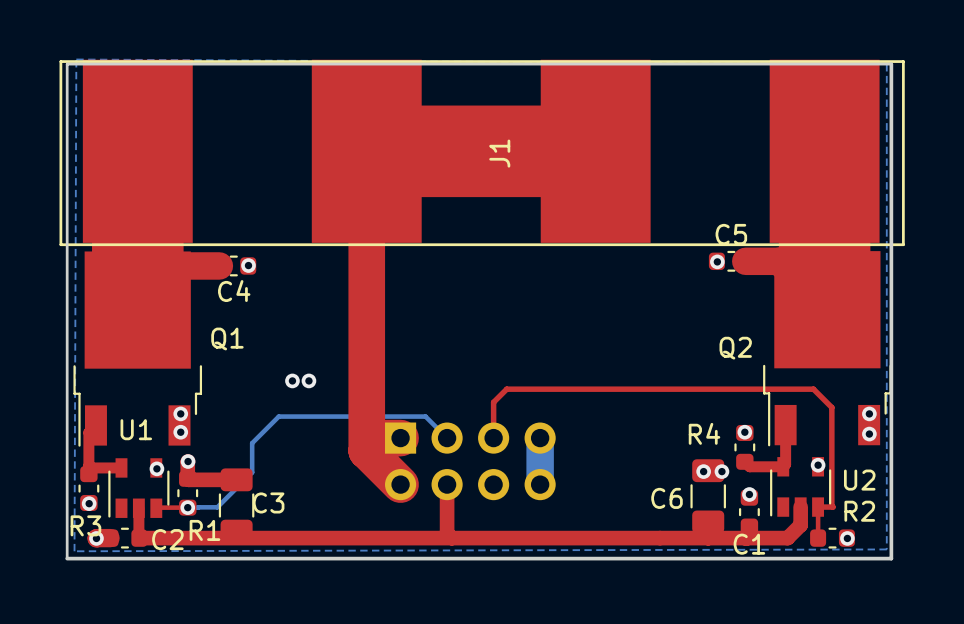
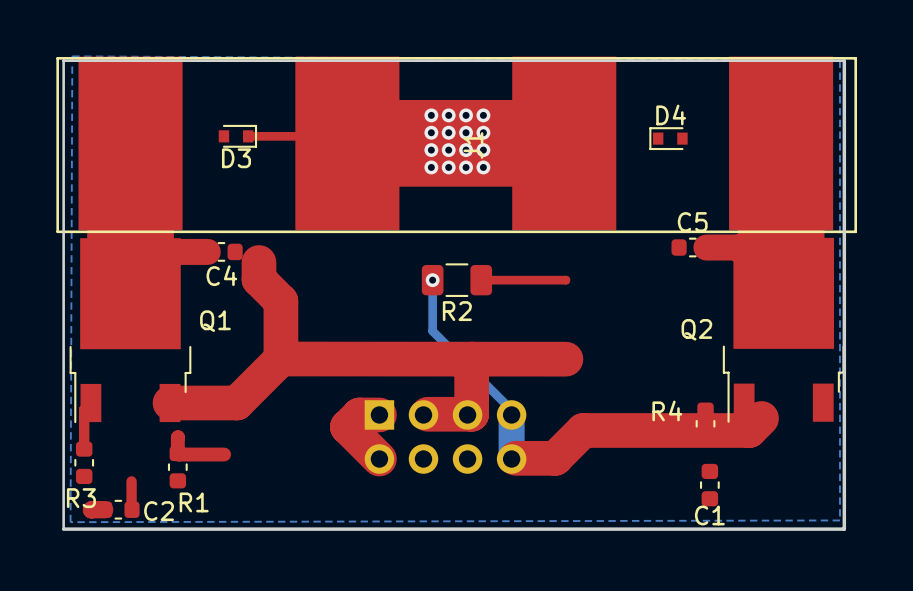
top track: none -> (424, 108) (431, 115) (419, 115)
via: none -> (431, 115)
via: none -> (448, 115)
via: none -> (466, 115)
via: none -> (483, 115)
via: none -> (431, 132)
via: none -> (448, 132)
via: none -> (466, 132)
via: none -> (483, 132)
D3: none -> (237, 136)
top track: none -> (248, 136) (340, 136)
D4: none -> (668, 138)
top track: (366, 151) (366, 450) -> none
via: none -> (431, 150)
via: none -> (448, 150)
via: none -> (466, 150)
via: none -> (483, 150)
via: none -> (431, 167)
via: none -> (448, 167)
via: none -> (466, 167)
via: none -> (483, 167)
via: (717, 261) -> none
via: (248, 265) -> none
top track: none -> (258, 262) (258, 279) (280, 301) (280, 359)
bottom track: none -> (432, 280) (432, 331) (515, 414)
via: none -> (432, 280)
top track: none -> (481, 280) (565, 280)
top track: none -> (280, 359) (565, 359)
top track: none -> (280, 359) (236, 403) (170, 403)
top track: none -> (472, 359) (471, 414) (427, 414)
via: (292, 380) -> none
via: (308, 380) -> none
via: (180, 413) -> none
via: (869, 413) -> none
top track: (785, 425) (785, 464) (783, 466) (749, 466) (744, 461) -> none
via: (180, 432) -> none
via: (744, 432) -> none
via: (869, 434) -> none
bottom track: (447, 438) (425, 416) (278, 416) (252, 443) (252, 472) (217, 507) (187, 507) -> none
top track: (493, 438) (493, 402) (506, 389) (813, 389) (831, 407) (833, 507) (818, 507) (818, 538) -> none
top track: none -> (761, 418) (749, 430) (583, 430) (555, 458) (515, 458)
via: (188, 461) -> none
via: (818, 465) -> none
top track: (88, 466) (90, 467) (121, 467) -> none
via: (156, 468) -> none
via: (703, 471) -> none
via: (721, 471) -> none
top track: (447, 484) (447, 533) (451, 538) -> none
U2: (800, 486) -> none
U1: (138, 488) -> none
via: (749, 494) -> none
C6: (708, 496) -> none
via: (89, 503) -> none
C3: (236, 505) -> none
top track: (187, 507) (156, 508) -> none
via: (187, 507) -> none
top track: (800, 507) (800, 525) (787, 538) (139, 538) -> none
R2 name position: R2 (859, 511) -> R2 (457, 311)
R2 footprint: [810, 527, 855, 549] -> [421, 263, 493, 297]
via: (96, 538) -> none
via: (847, 538) -> none

